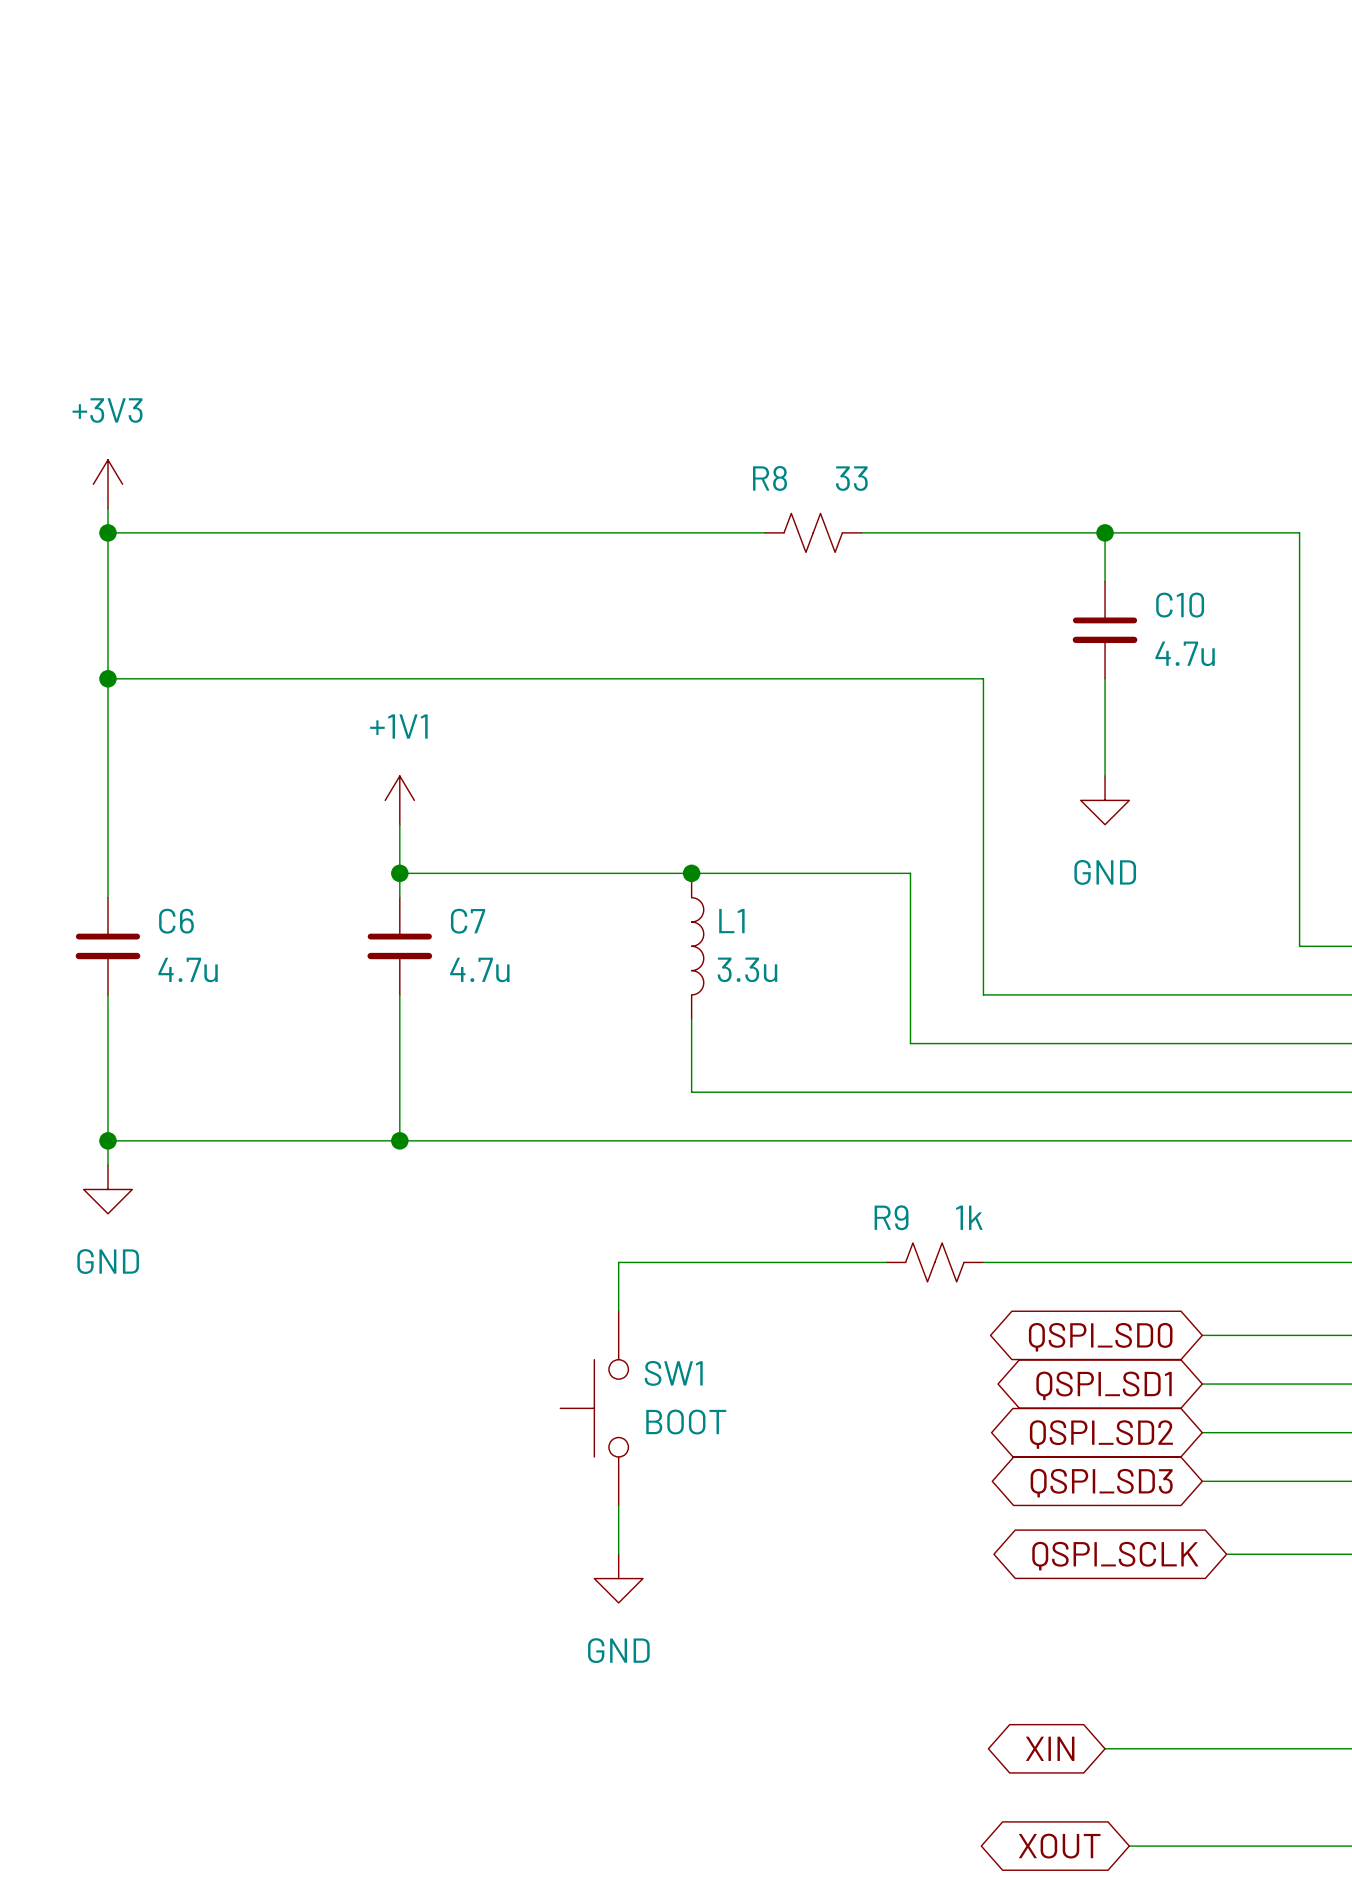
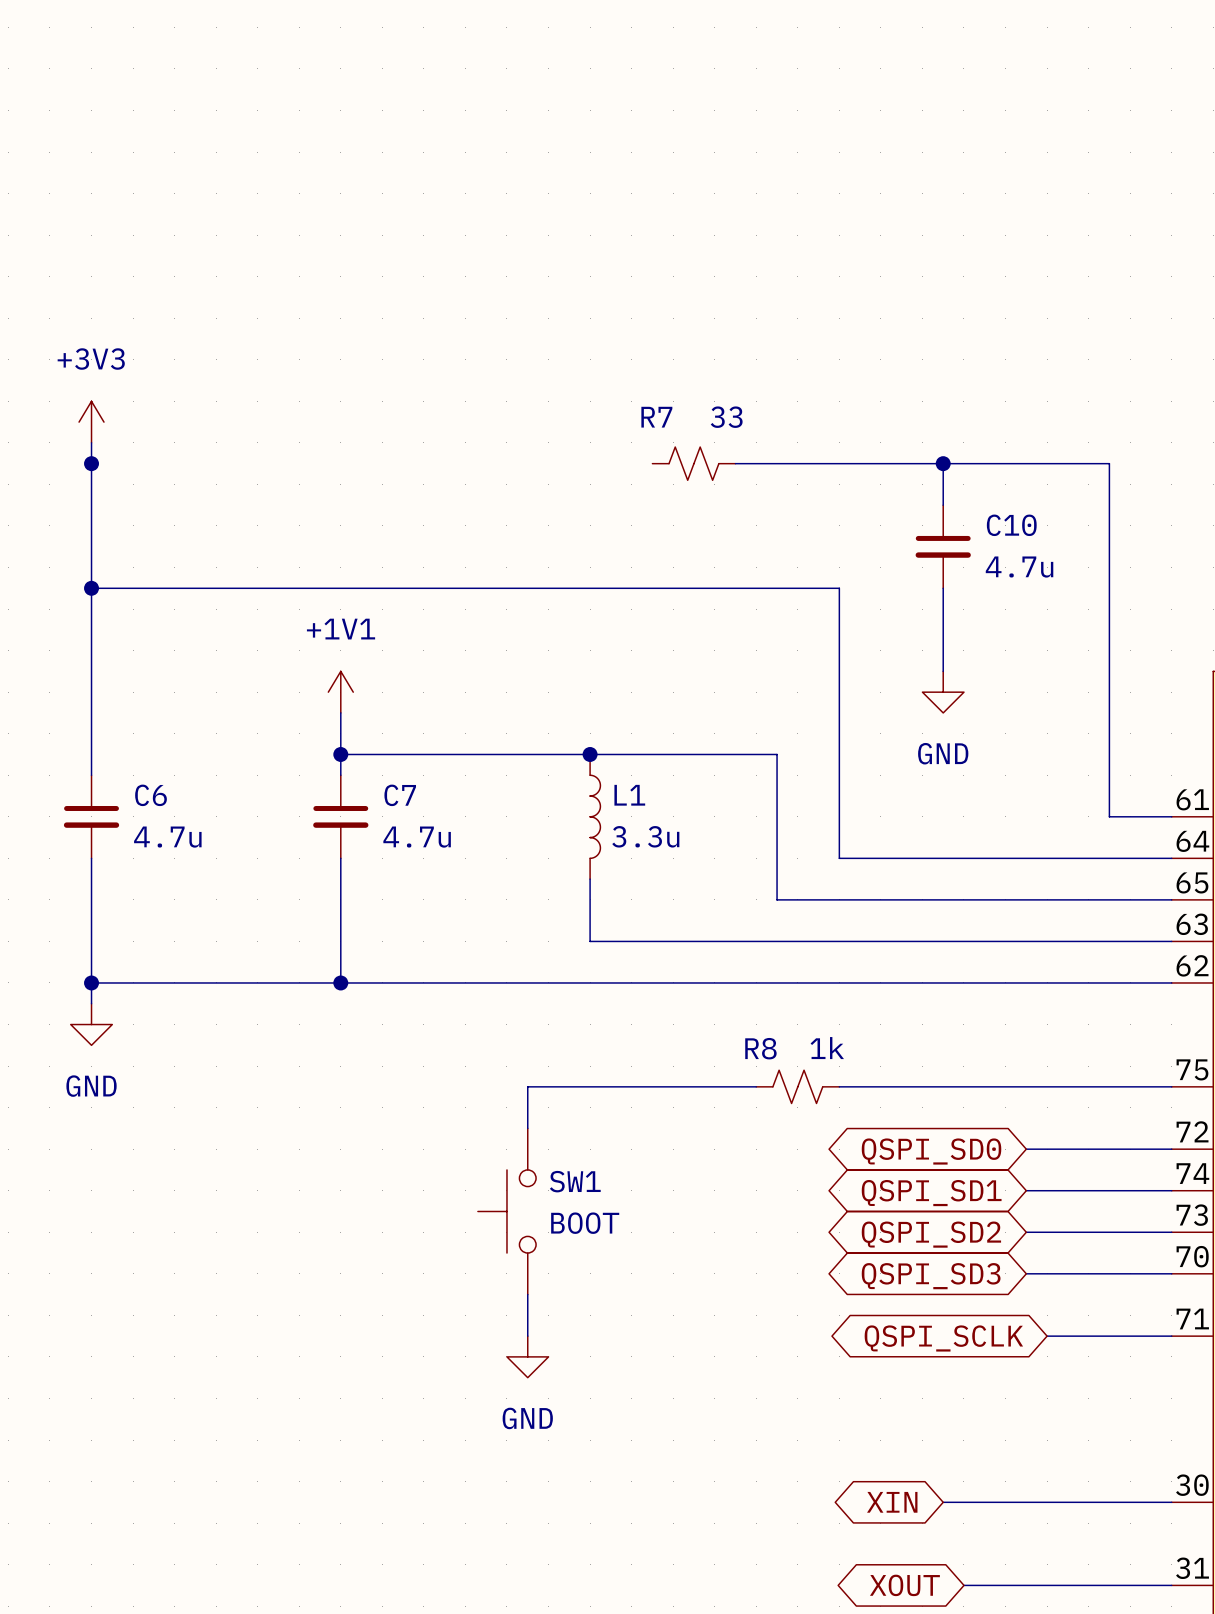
R8 name: R8 (770, 478) -> R7 (656, 417)
wire: (107, 532) (764, 532) -> none
R9 name: R9 (891, 1217) -> R8 (760, 1048)

